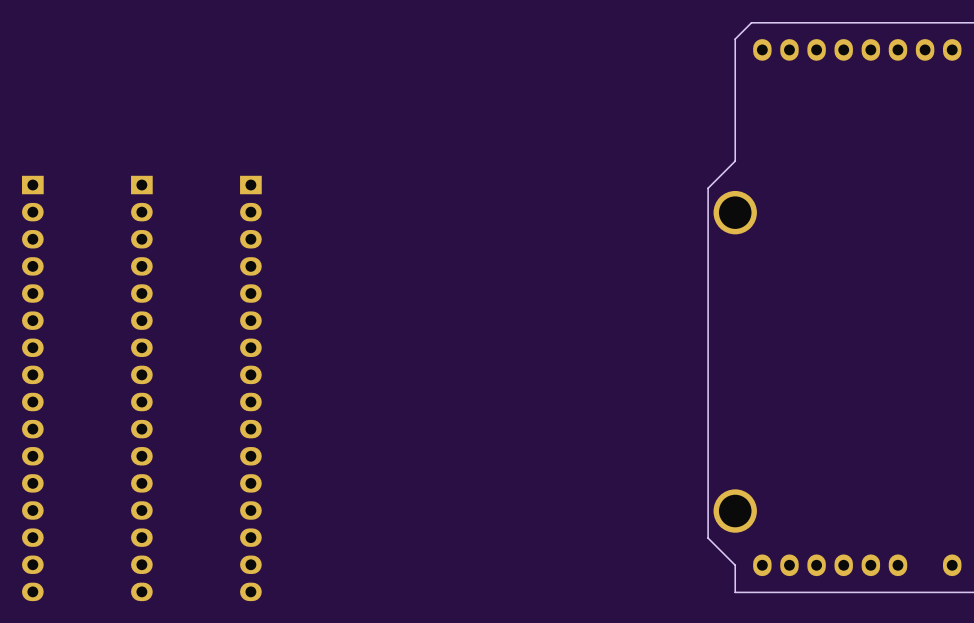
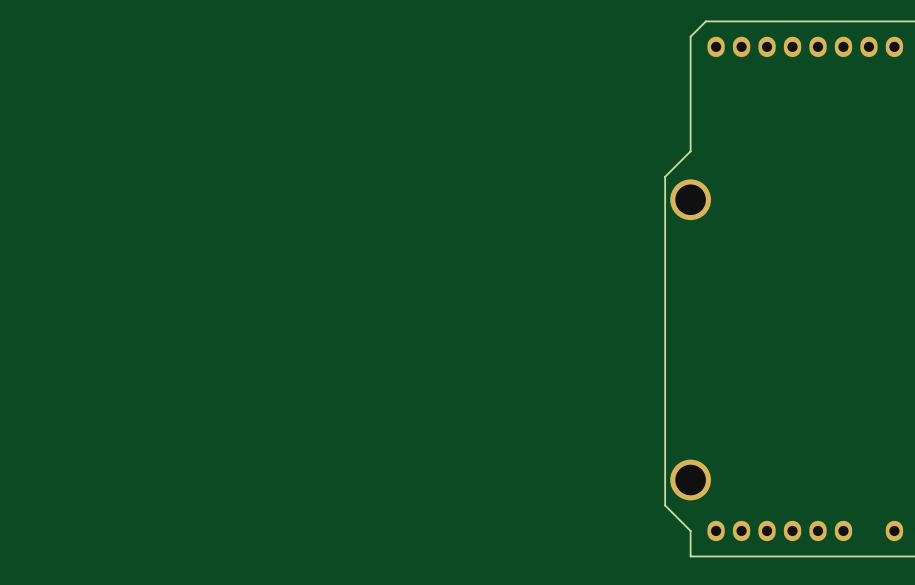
part: (32, 388) -> none
part: (141, 388) -> none
part: (250, 388) -> none

